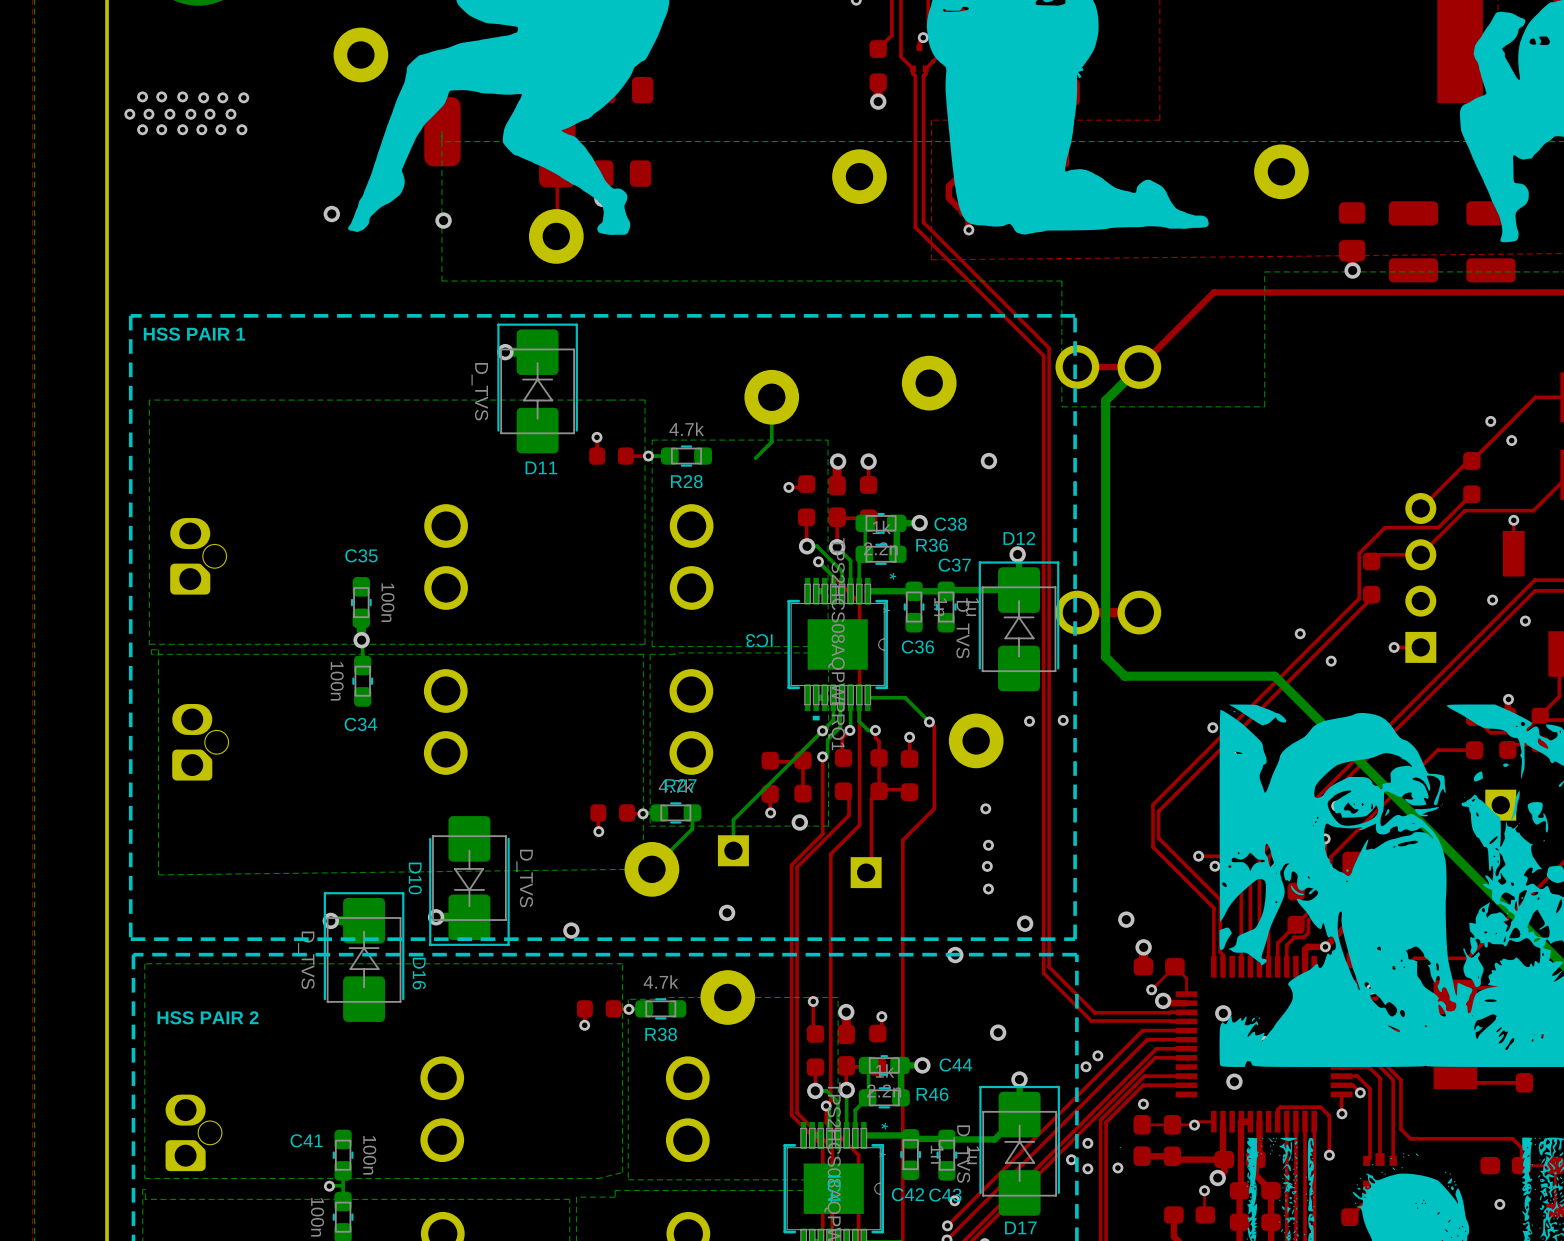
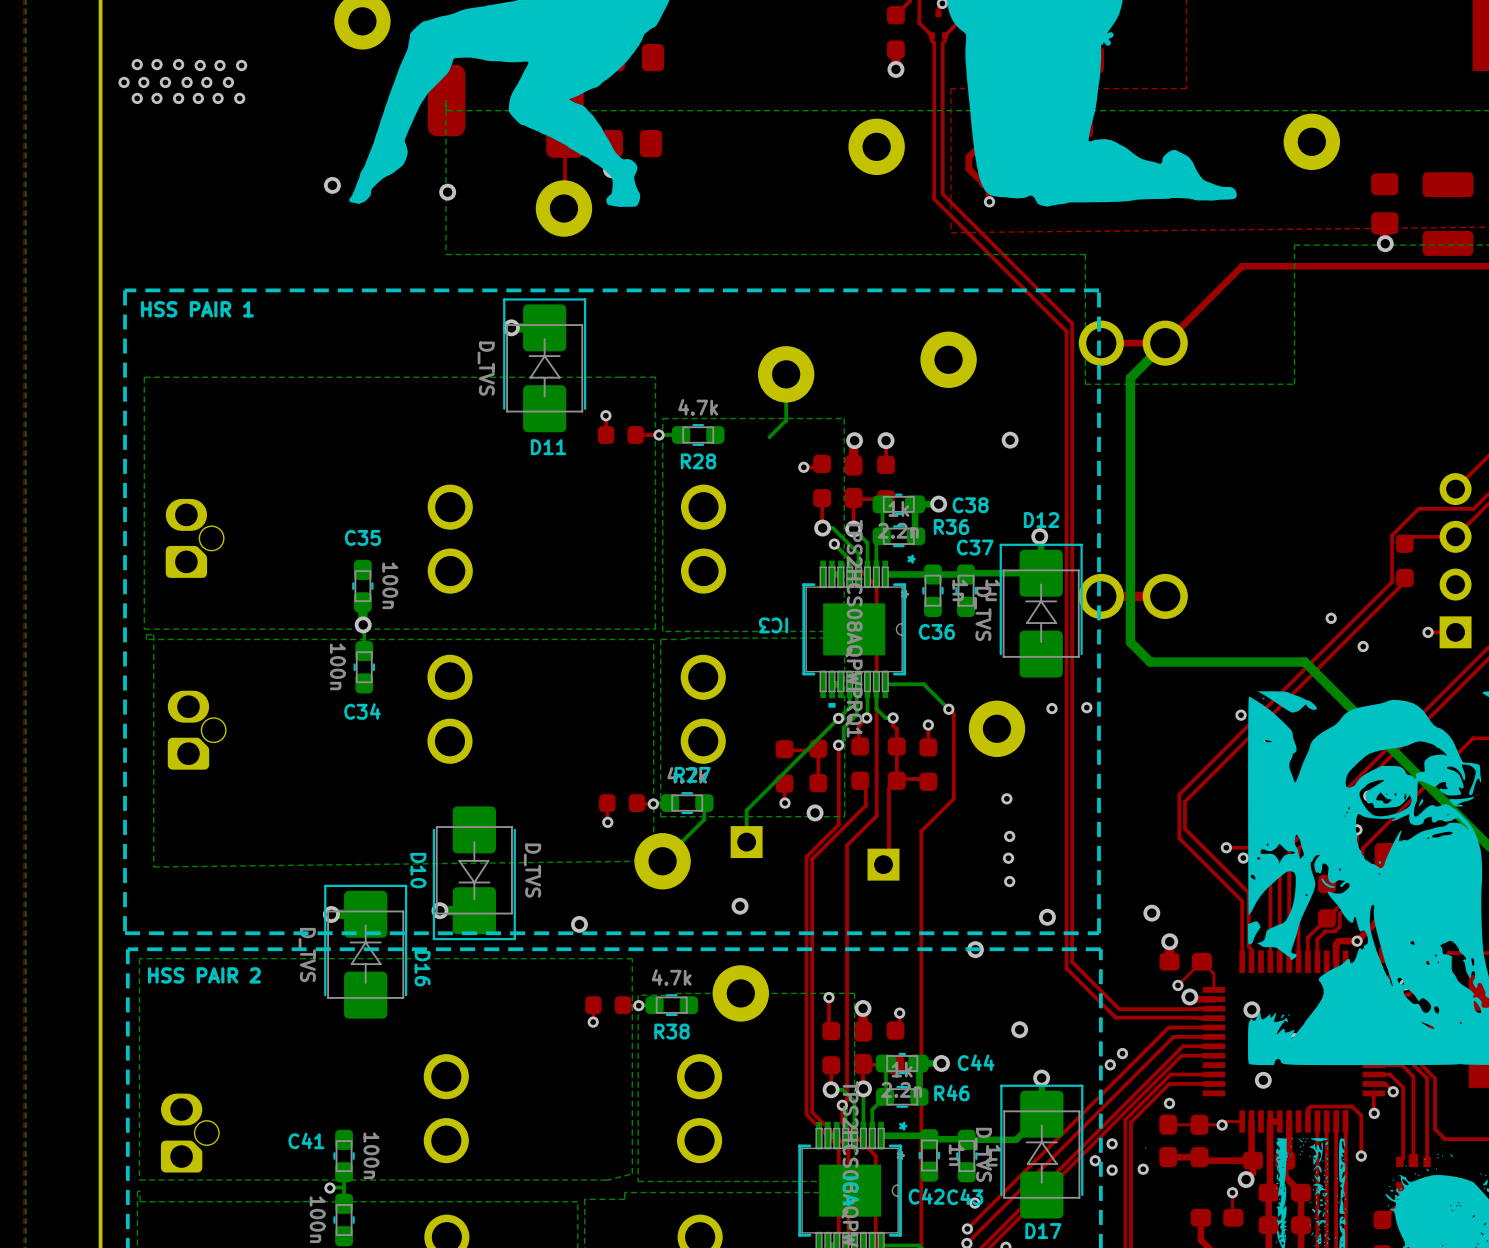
text position: HSS PAIR 2 (208, 1017) -> HSS PAIR 2 (204, 975)

